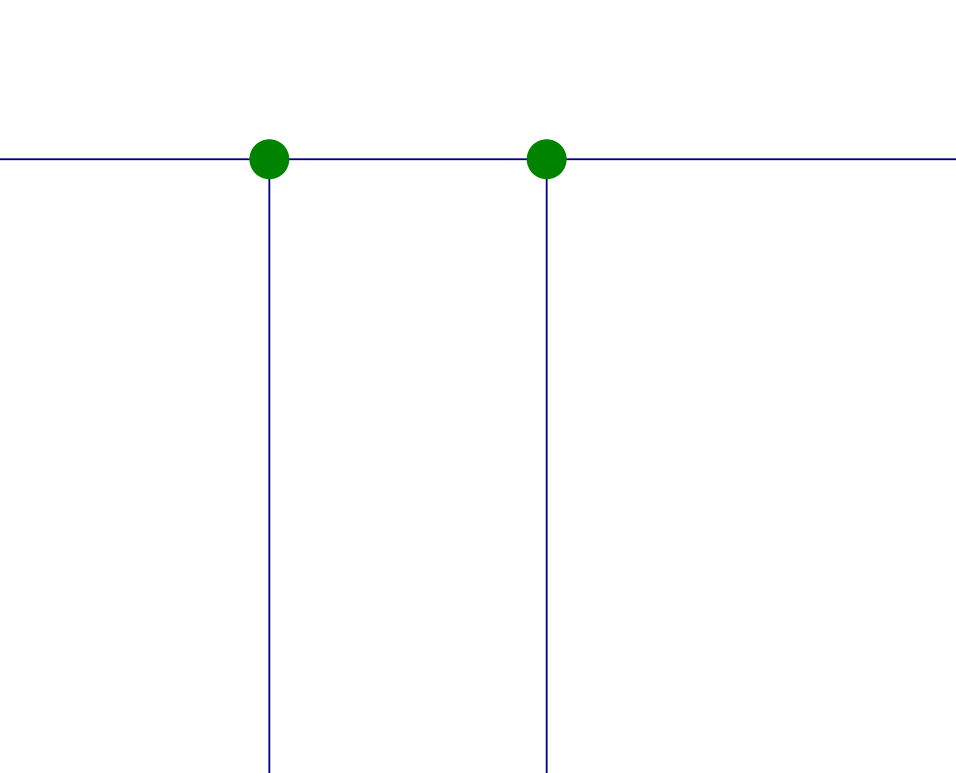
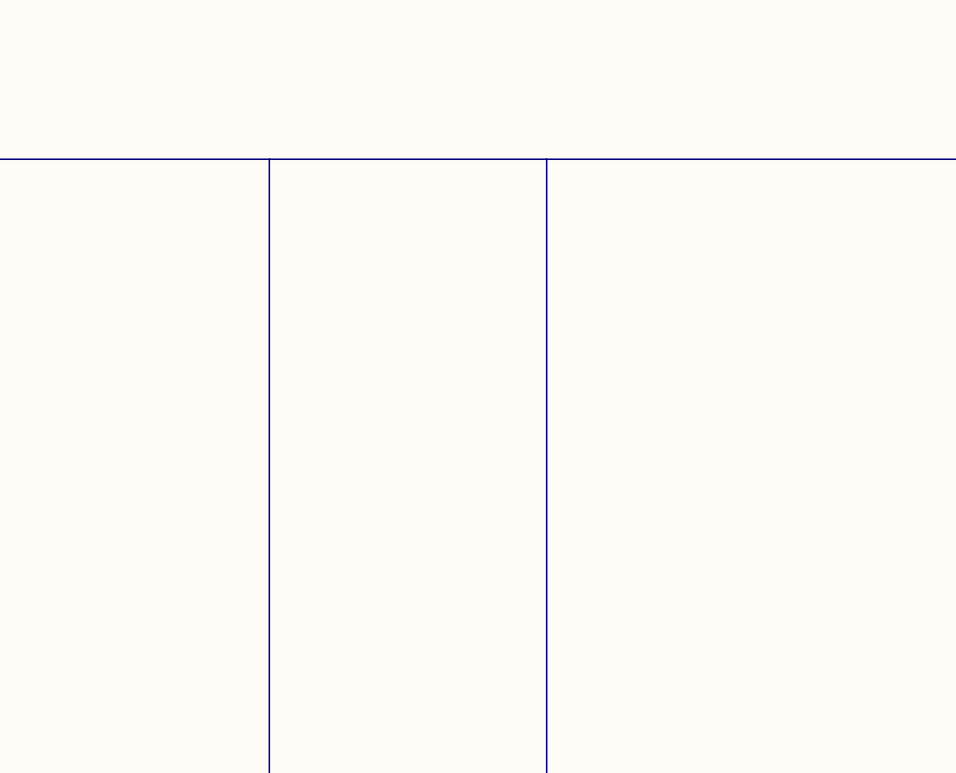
junction: (269, 159) -> none
junction: (546, 159) -> none

